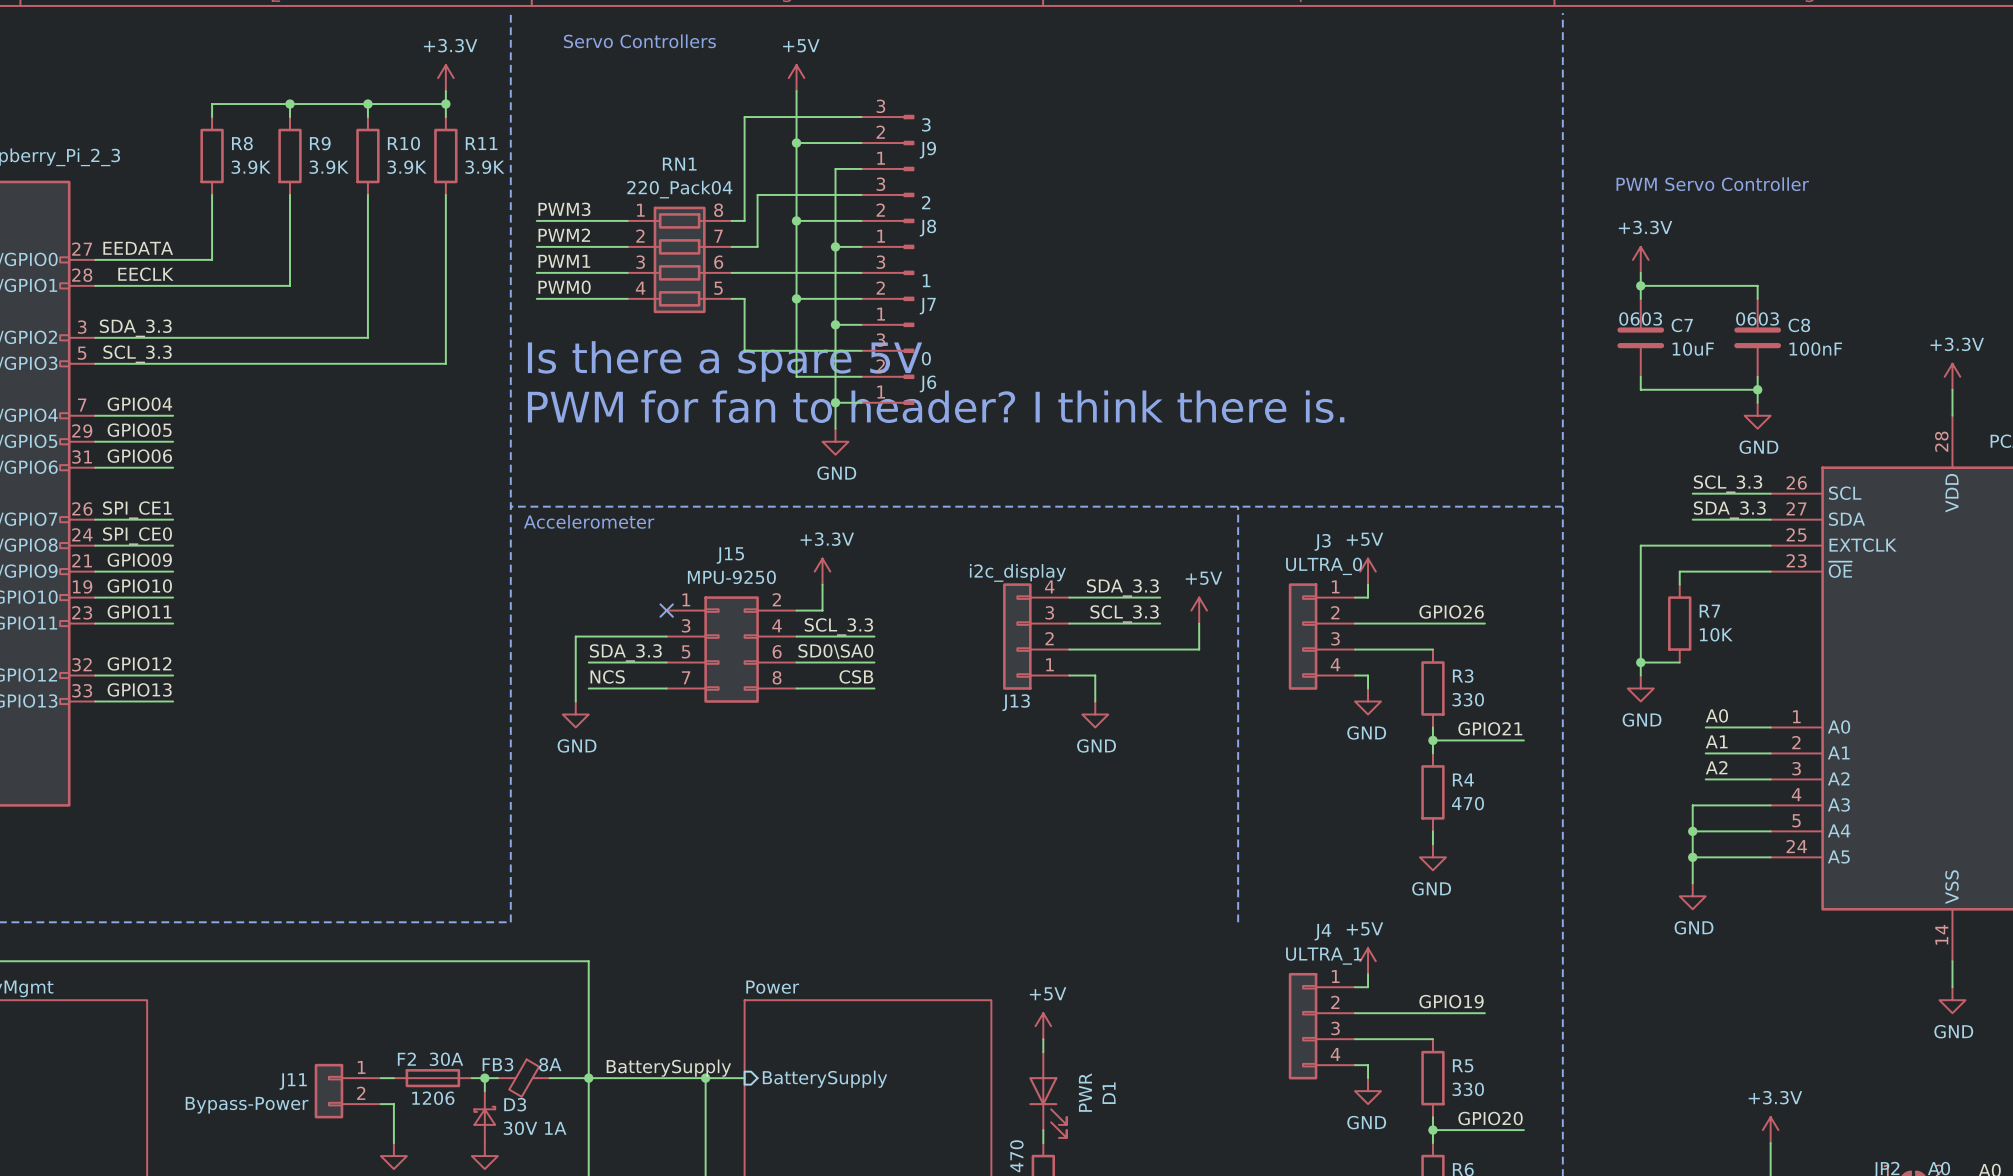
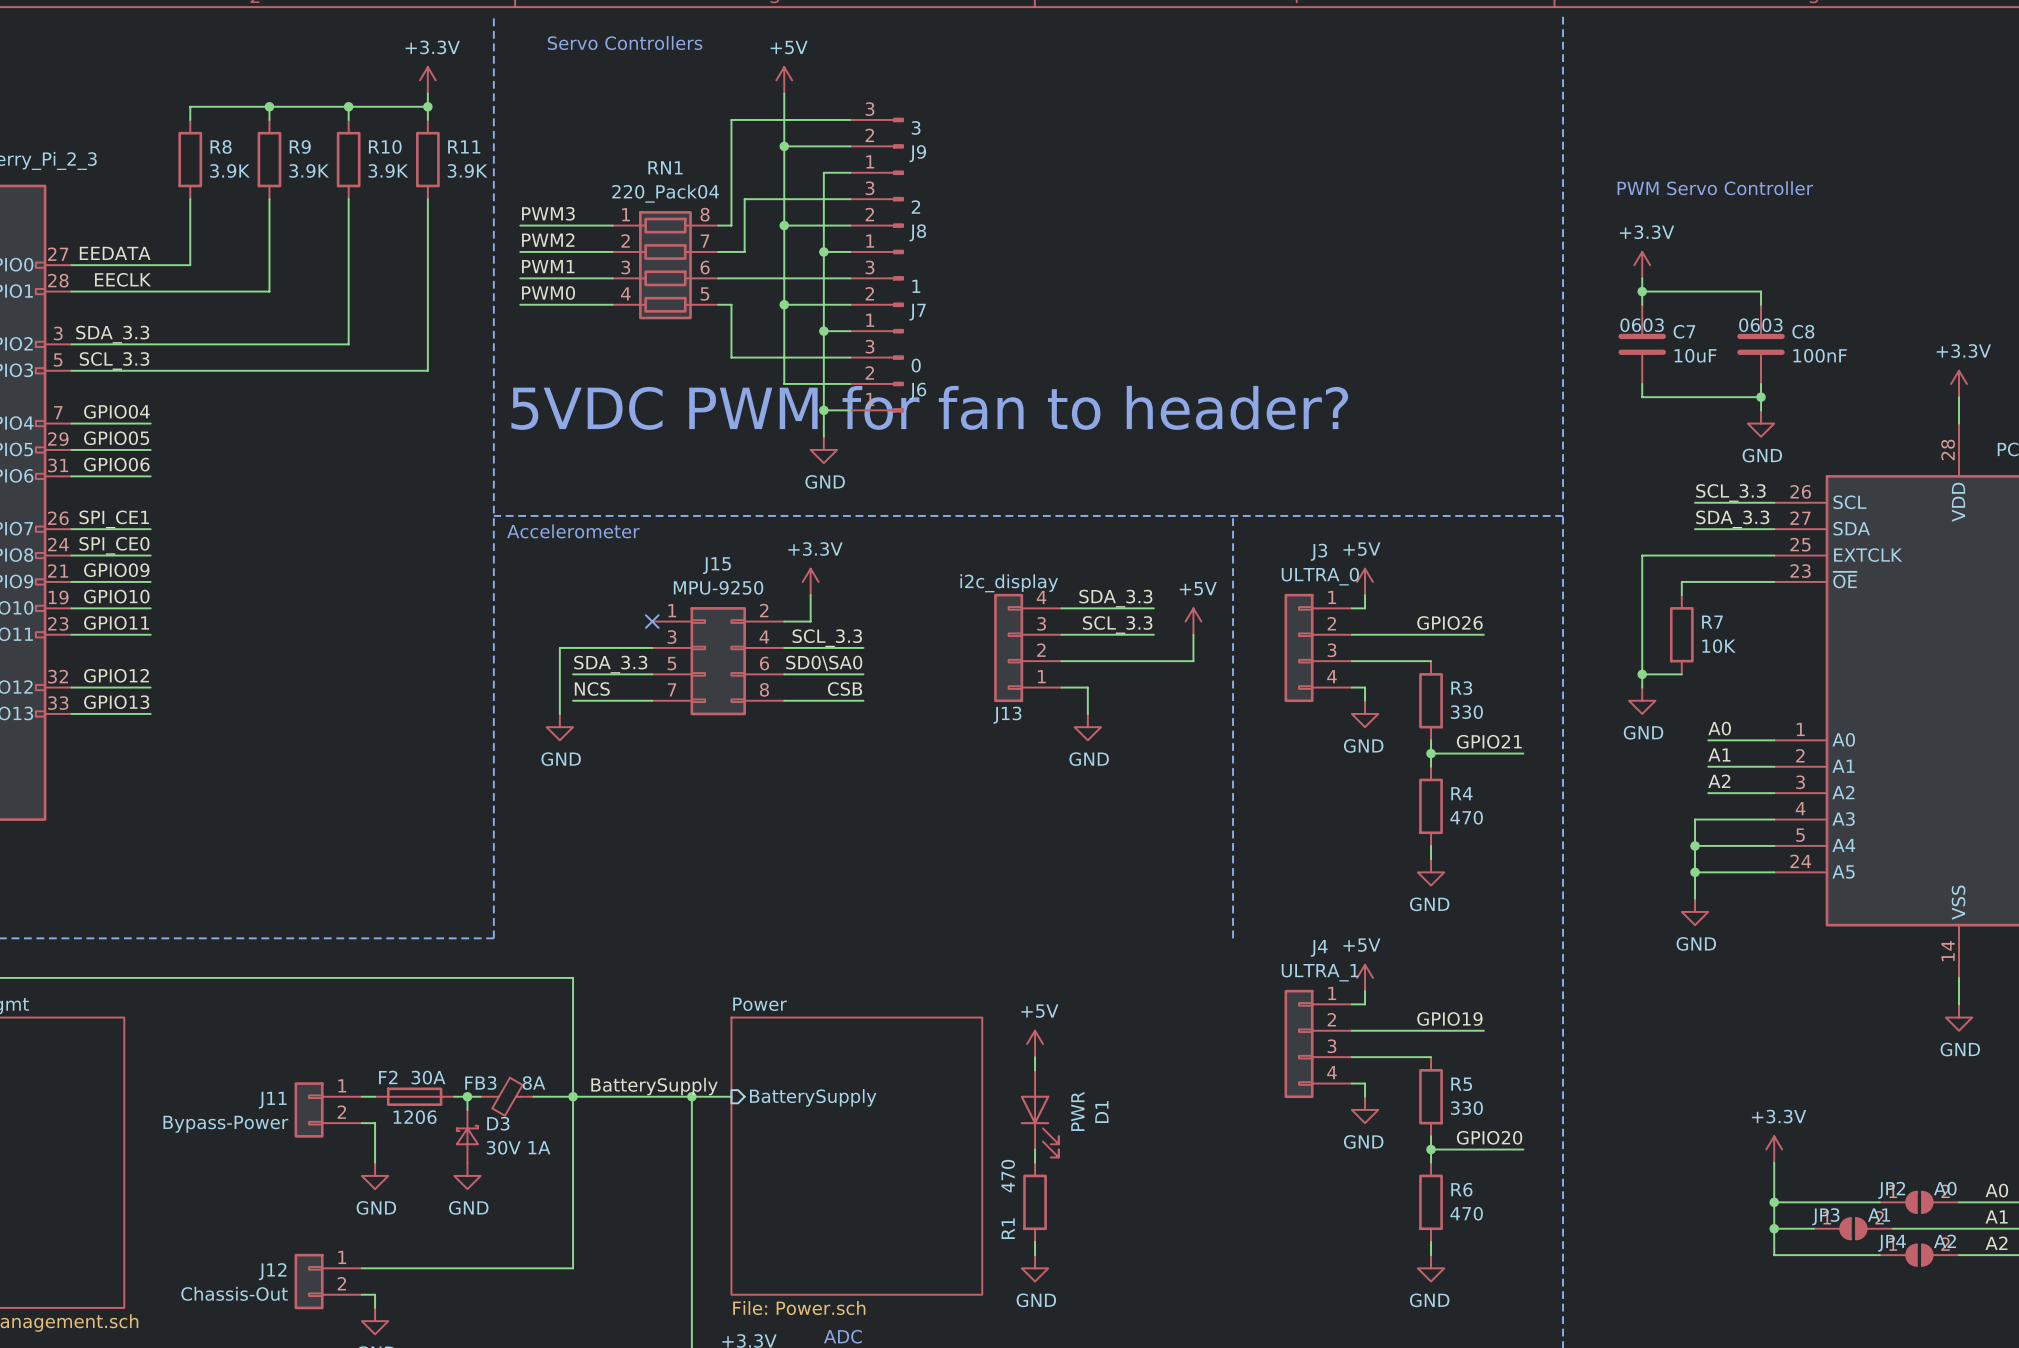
text: Is there a spare 5V (725, 361) -> none
text: PWM for fan to header? I think there is. (936, 406) -> 5VDC PWM for fan to header? (929, 407)

